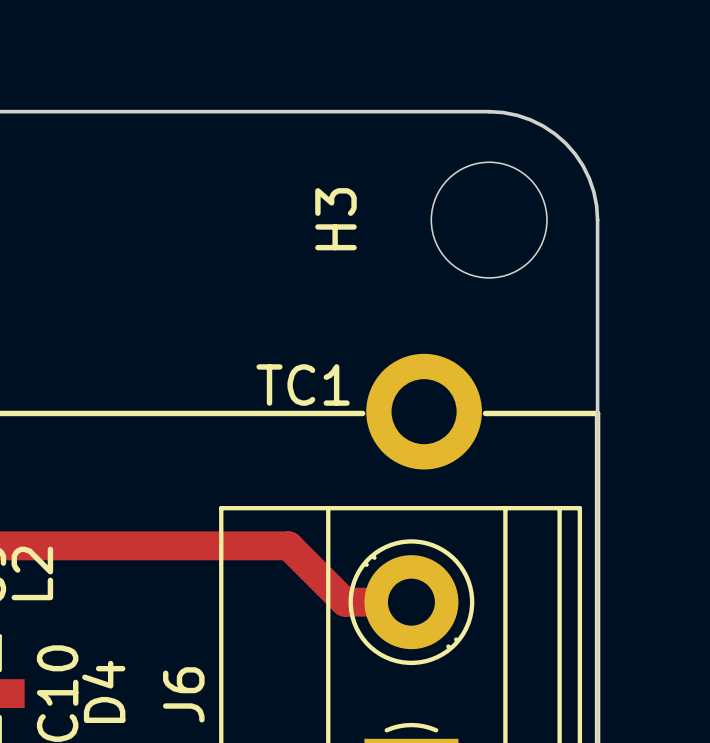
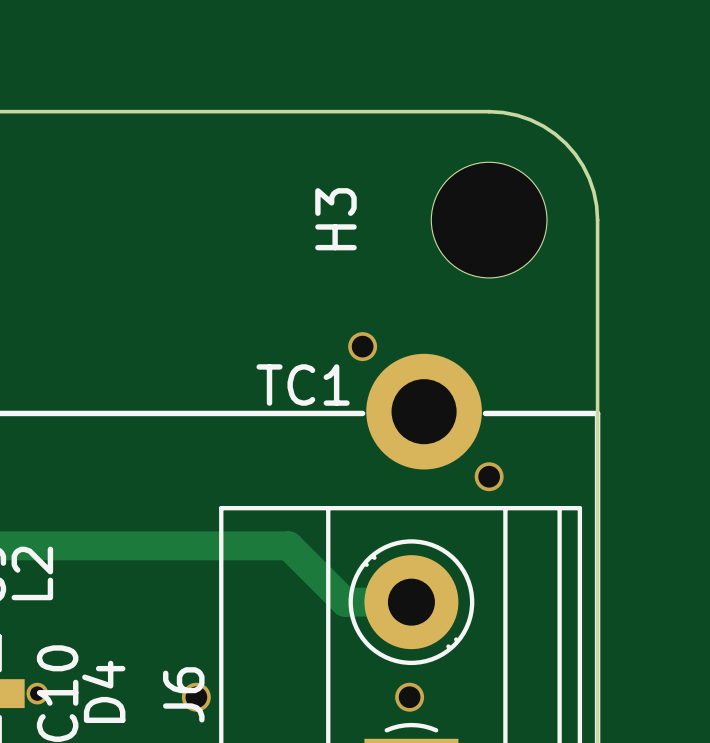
via: none -> (362, 346)
via: none -> (489, 476)
via: none -> (37, 693)
via: none -> (196, 697)
via: none -> (409, 697)

